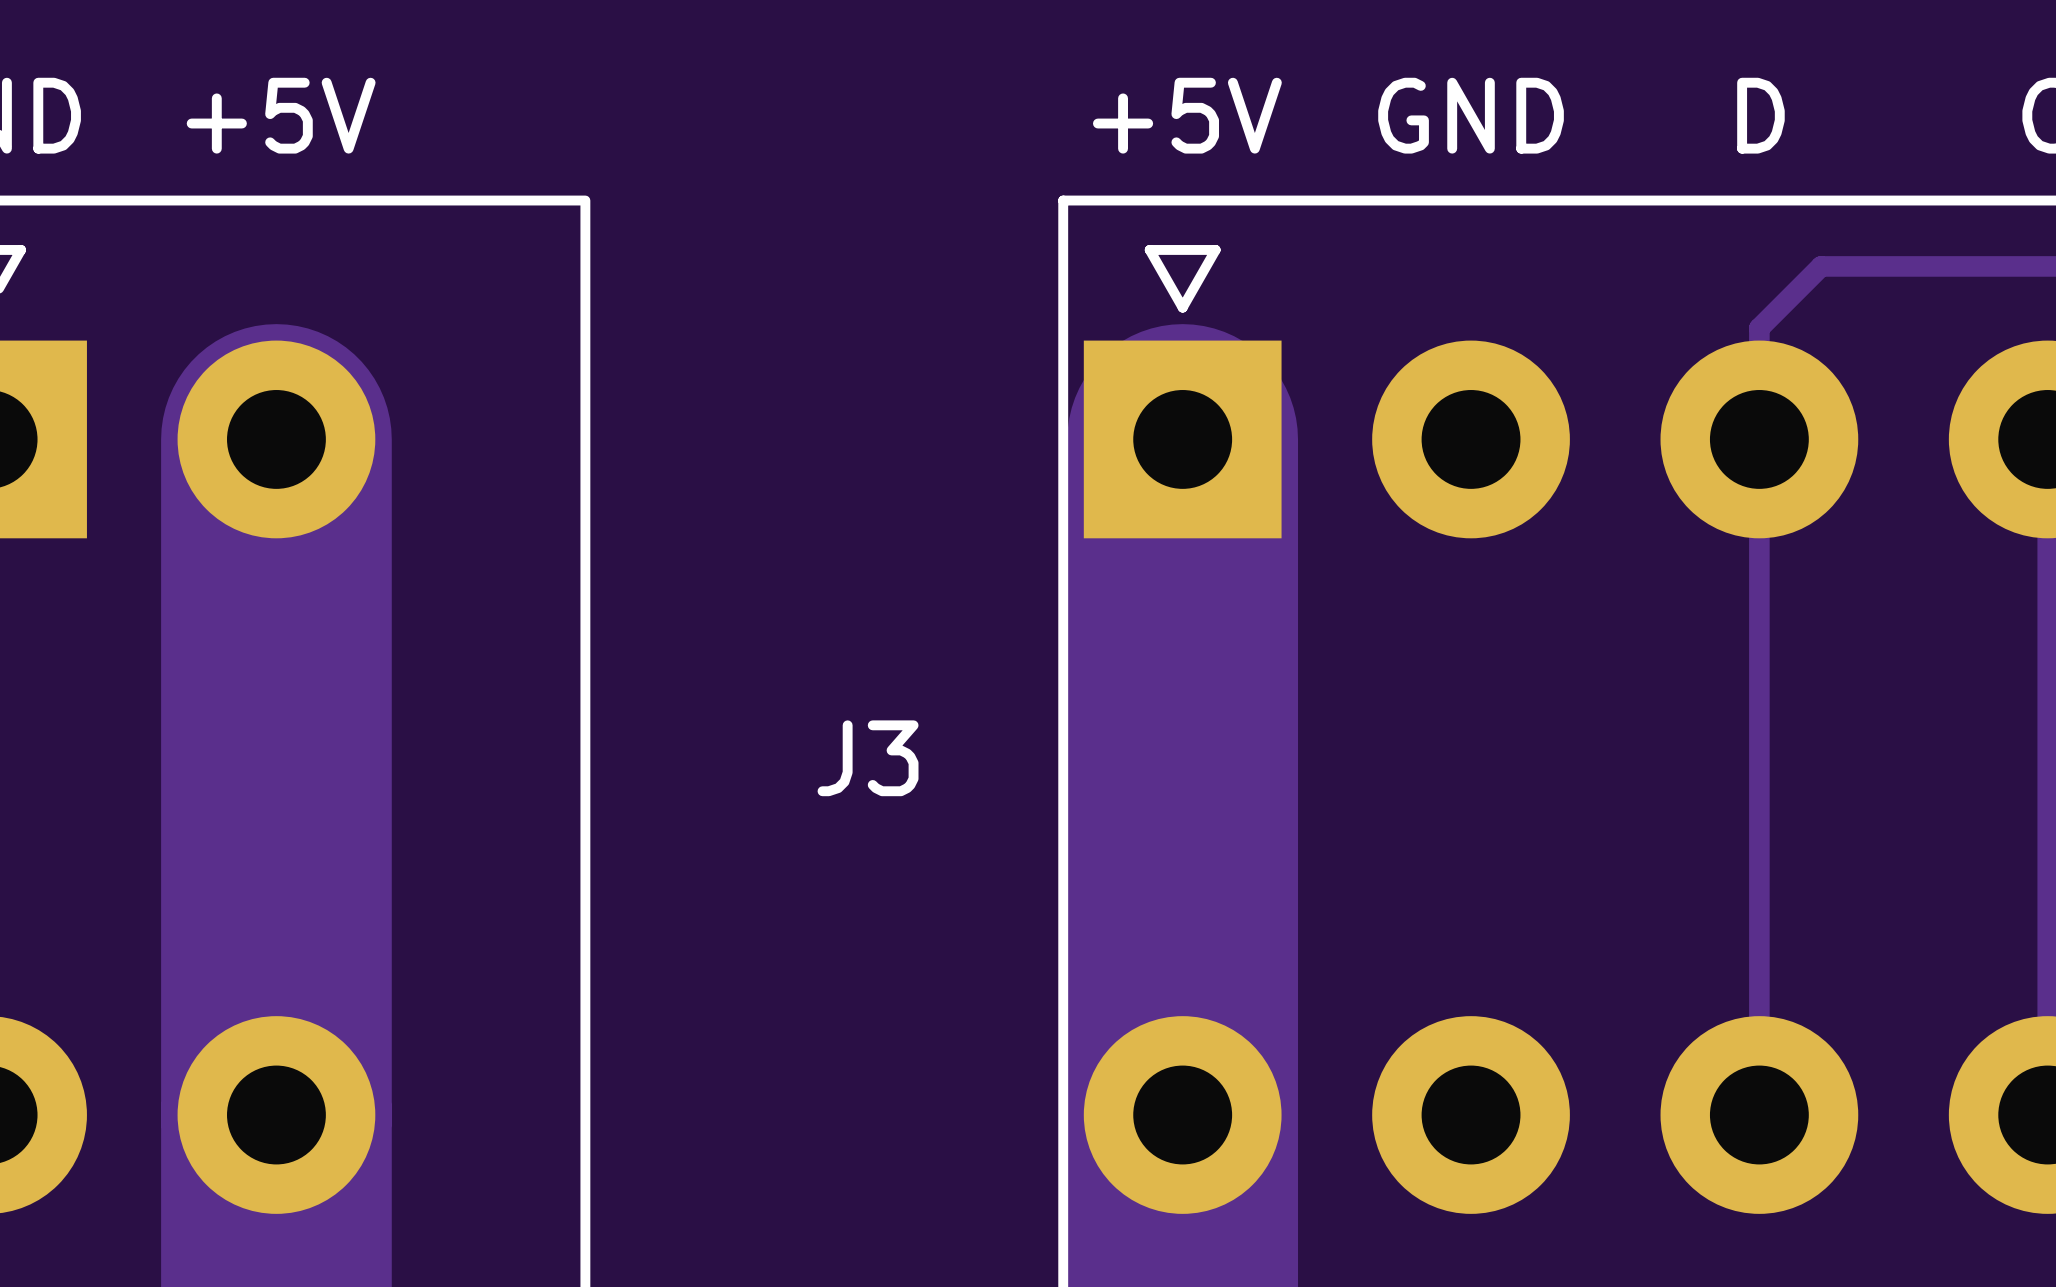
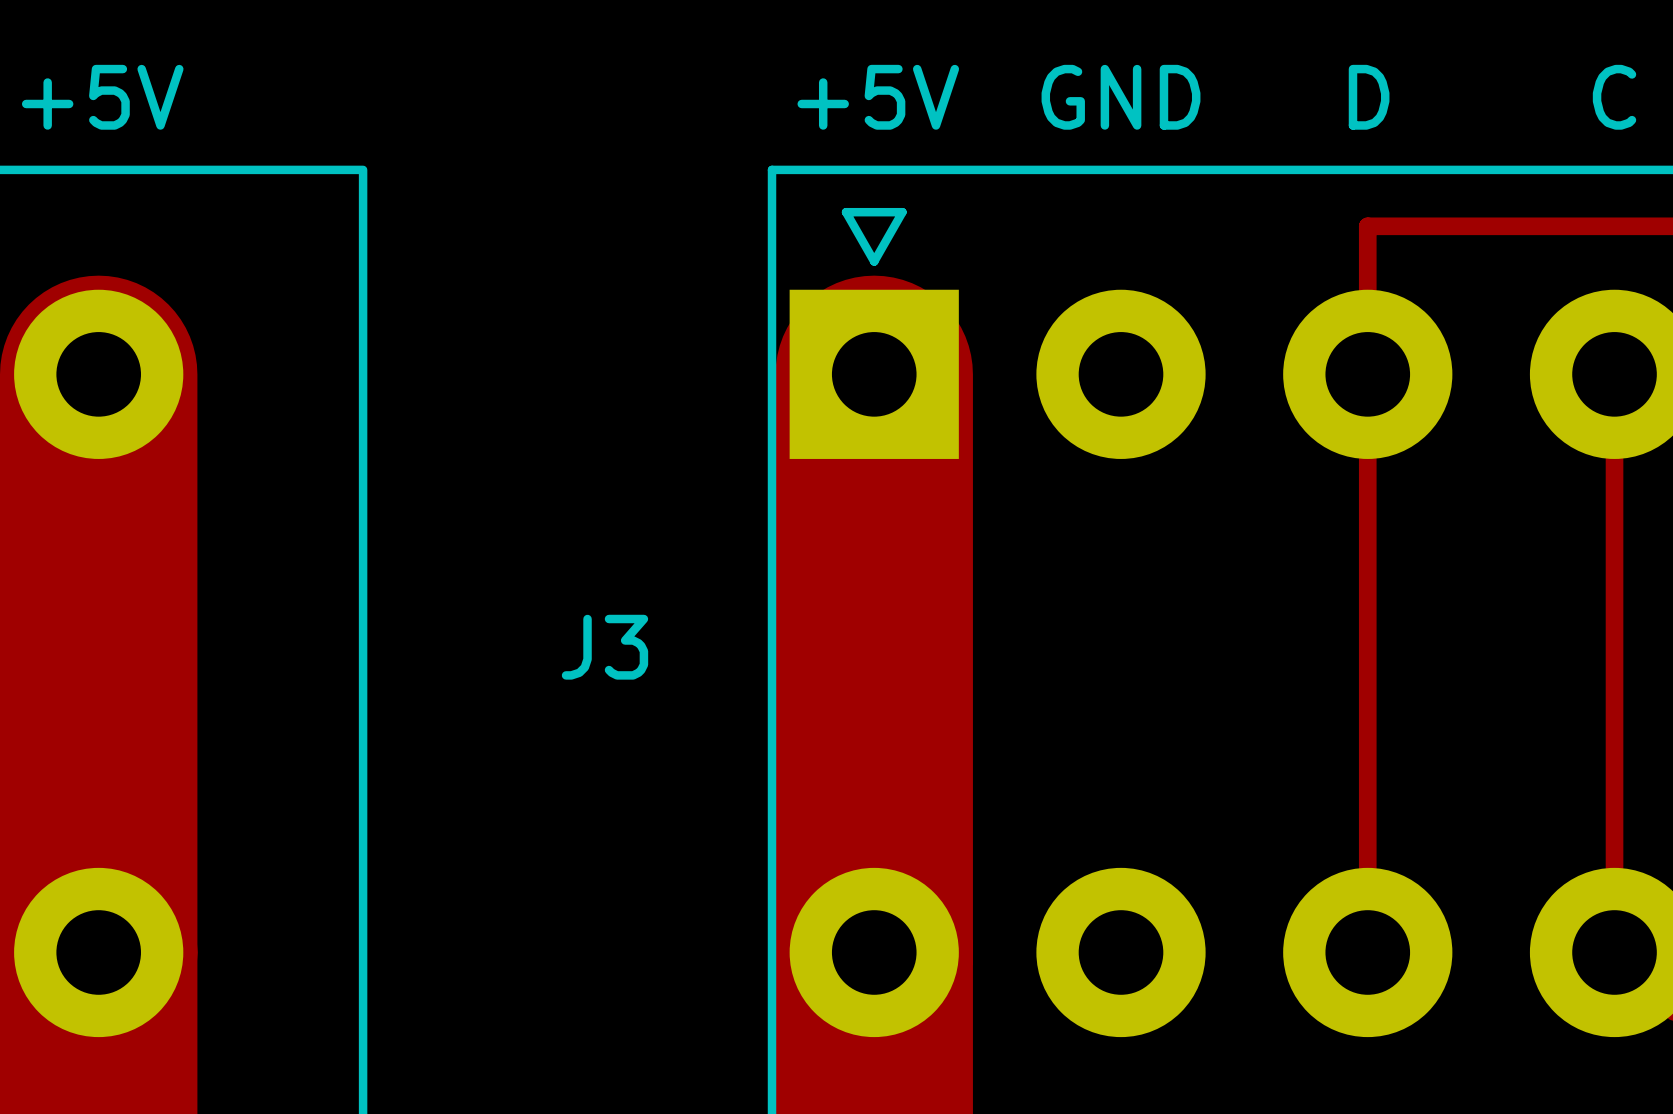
track: (1821, 266) (1759, 328) -> (1420, 226) (1367, 226) (1367, 279)

